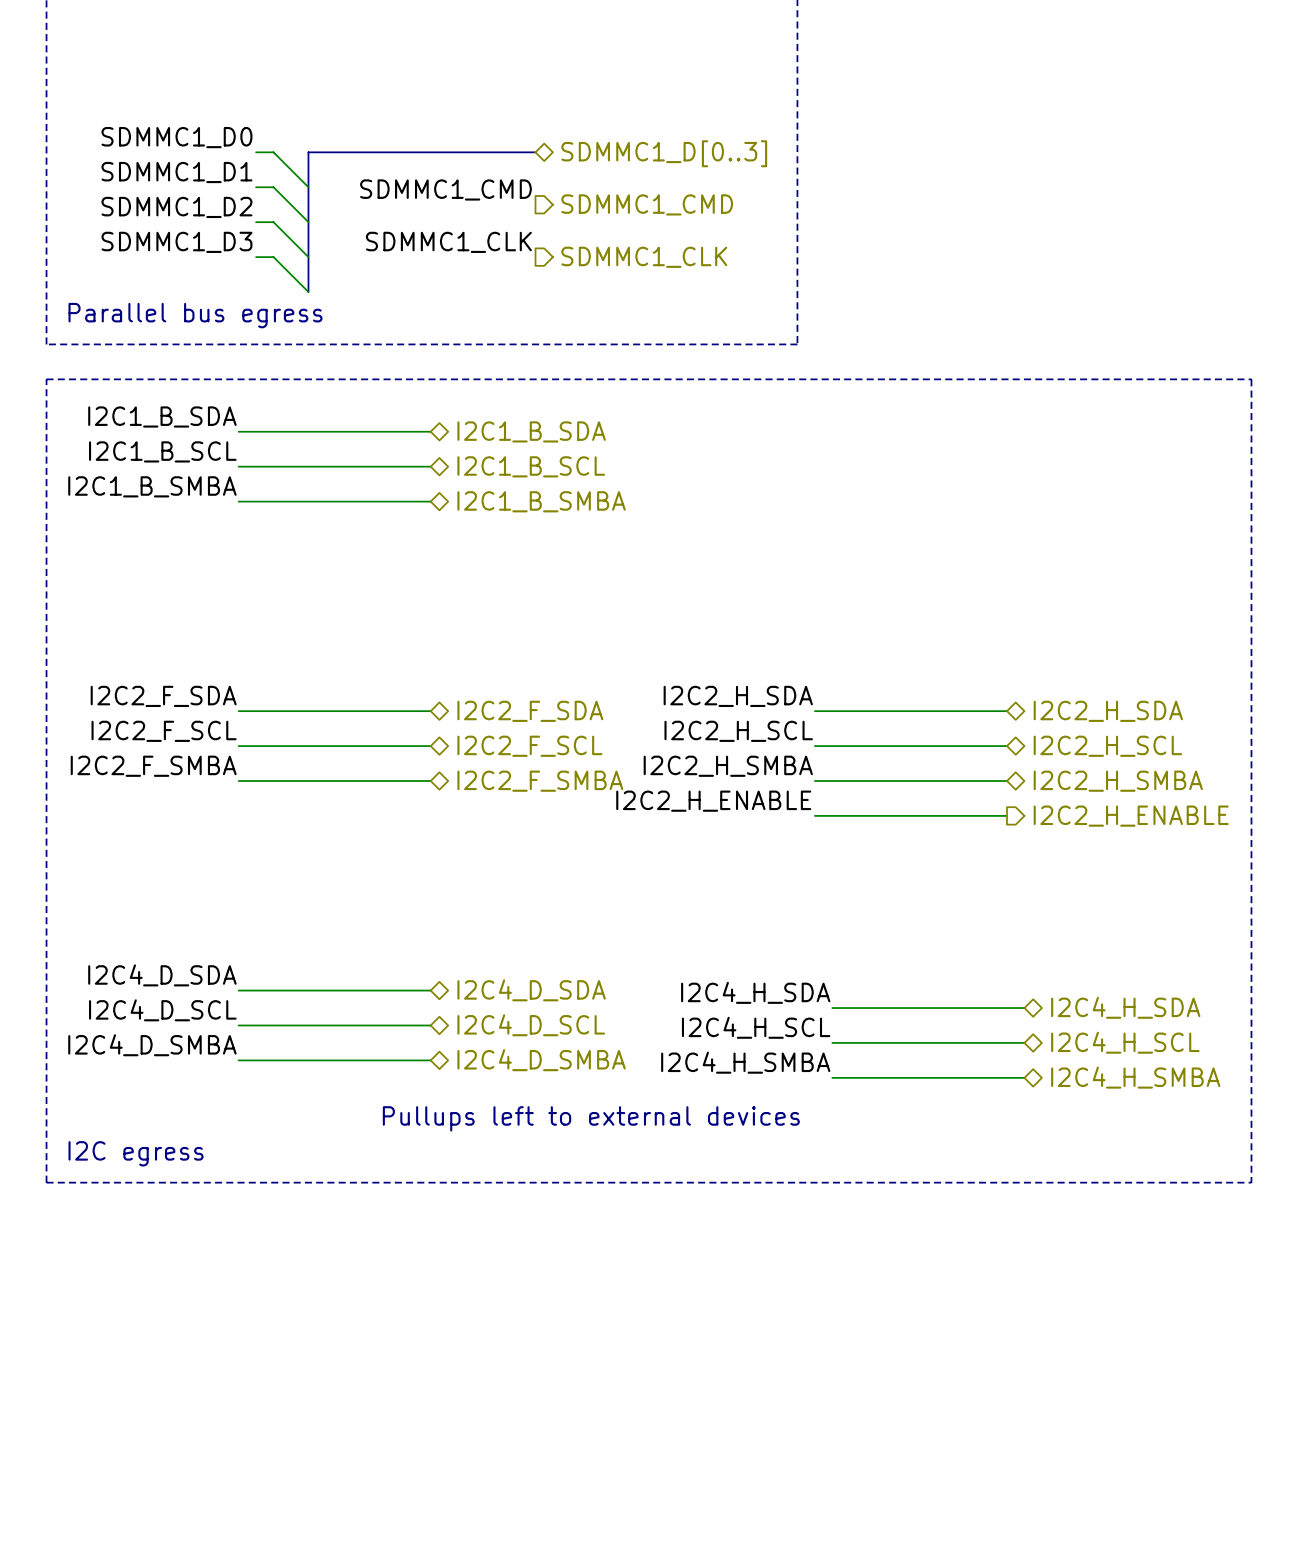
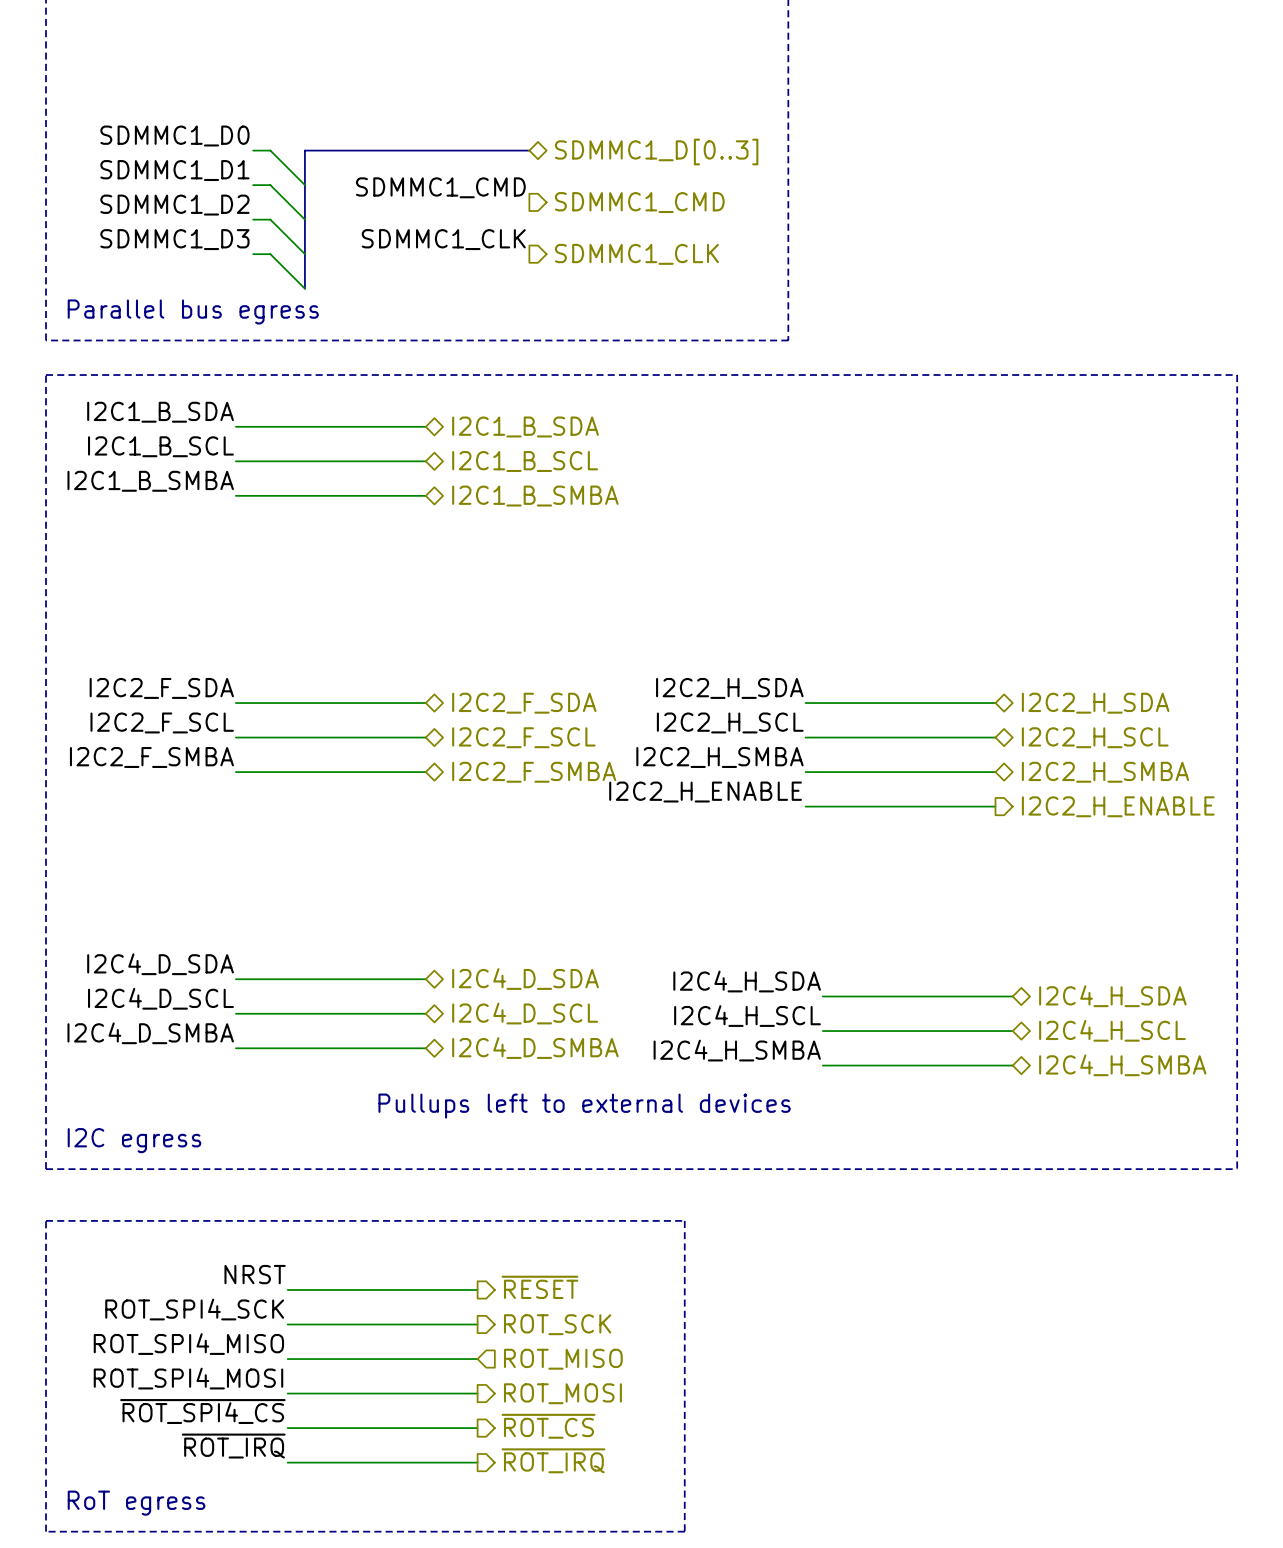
line: none -> (46, 1220) (46, 1531) (684, 1531) (684, 1220) (46, 1220)
label: none -> NRST (255, 1274)
hierarchical label: none -> ~{RESET} (539, 1287)
wire: none -> (287, 1289) (477, 1289)
label: none -> ROT_SPI4_SCK (194, 1309)
wire: none -> (287, 1324) (477, 1324)
hierarchical label: none -> ROT_SCK (557, 1324)
label: none -> ROT_SPI4_MISO (188, 1344)
wire: none -> (287, 1359) (477, 1359)
hierarchical label: none -> ROT_MISO (563, 1359)
label: none -> ROT_SPI4_MOSI (188, 1378)
wire: none -> (287, 1393) (477, 1393)
hierarchical label: none -> ROT_MOSI (562, 1393)
label: none -> ~{ROT_SPI4_CS} (202, 1411)
hierarchical label: none -> ~{ROT_CS} (548, 1426)
wire: none -> (287, 1428) (477, 1428)
label: none -> ~{ROT_IRQ} (233, 1446)
hierarchical label: none -> ~{ROT_IRQ} (553, 1460)
wire: none -> (287, 1462) (477, 1462)
text: none -> RoT egress (136, 1503)

